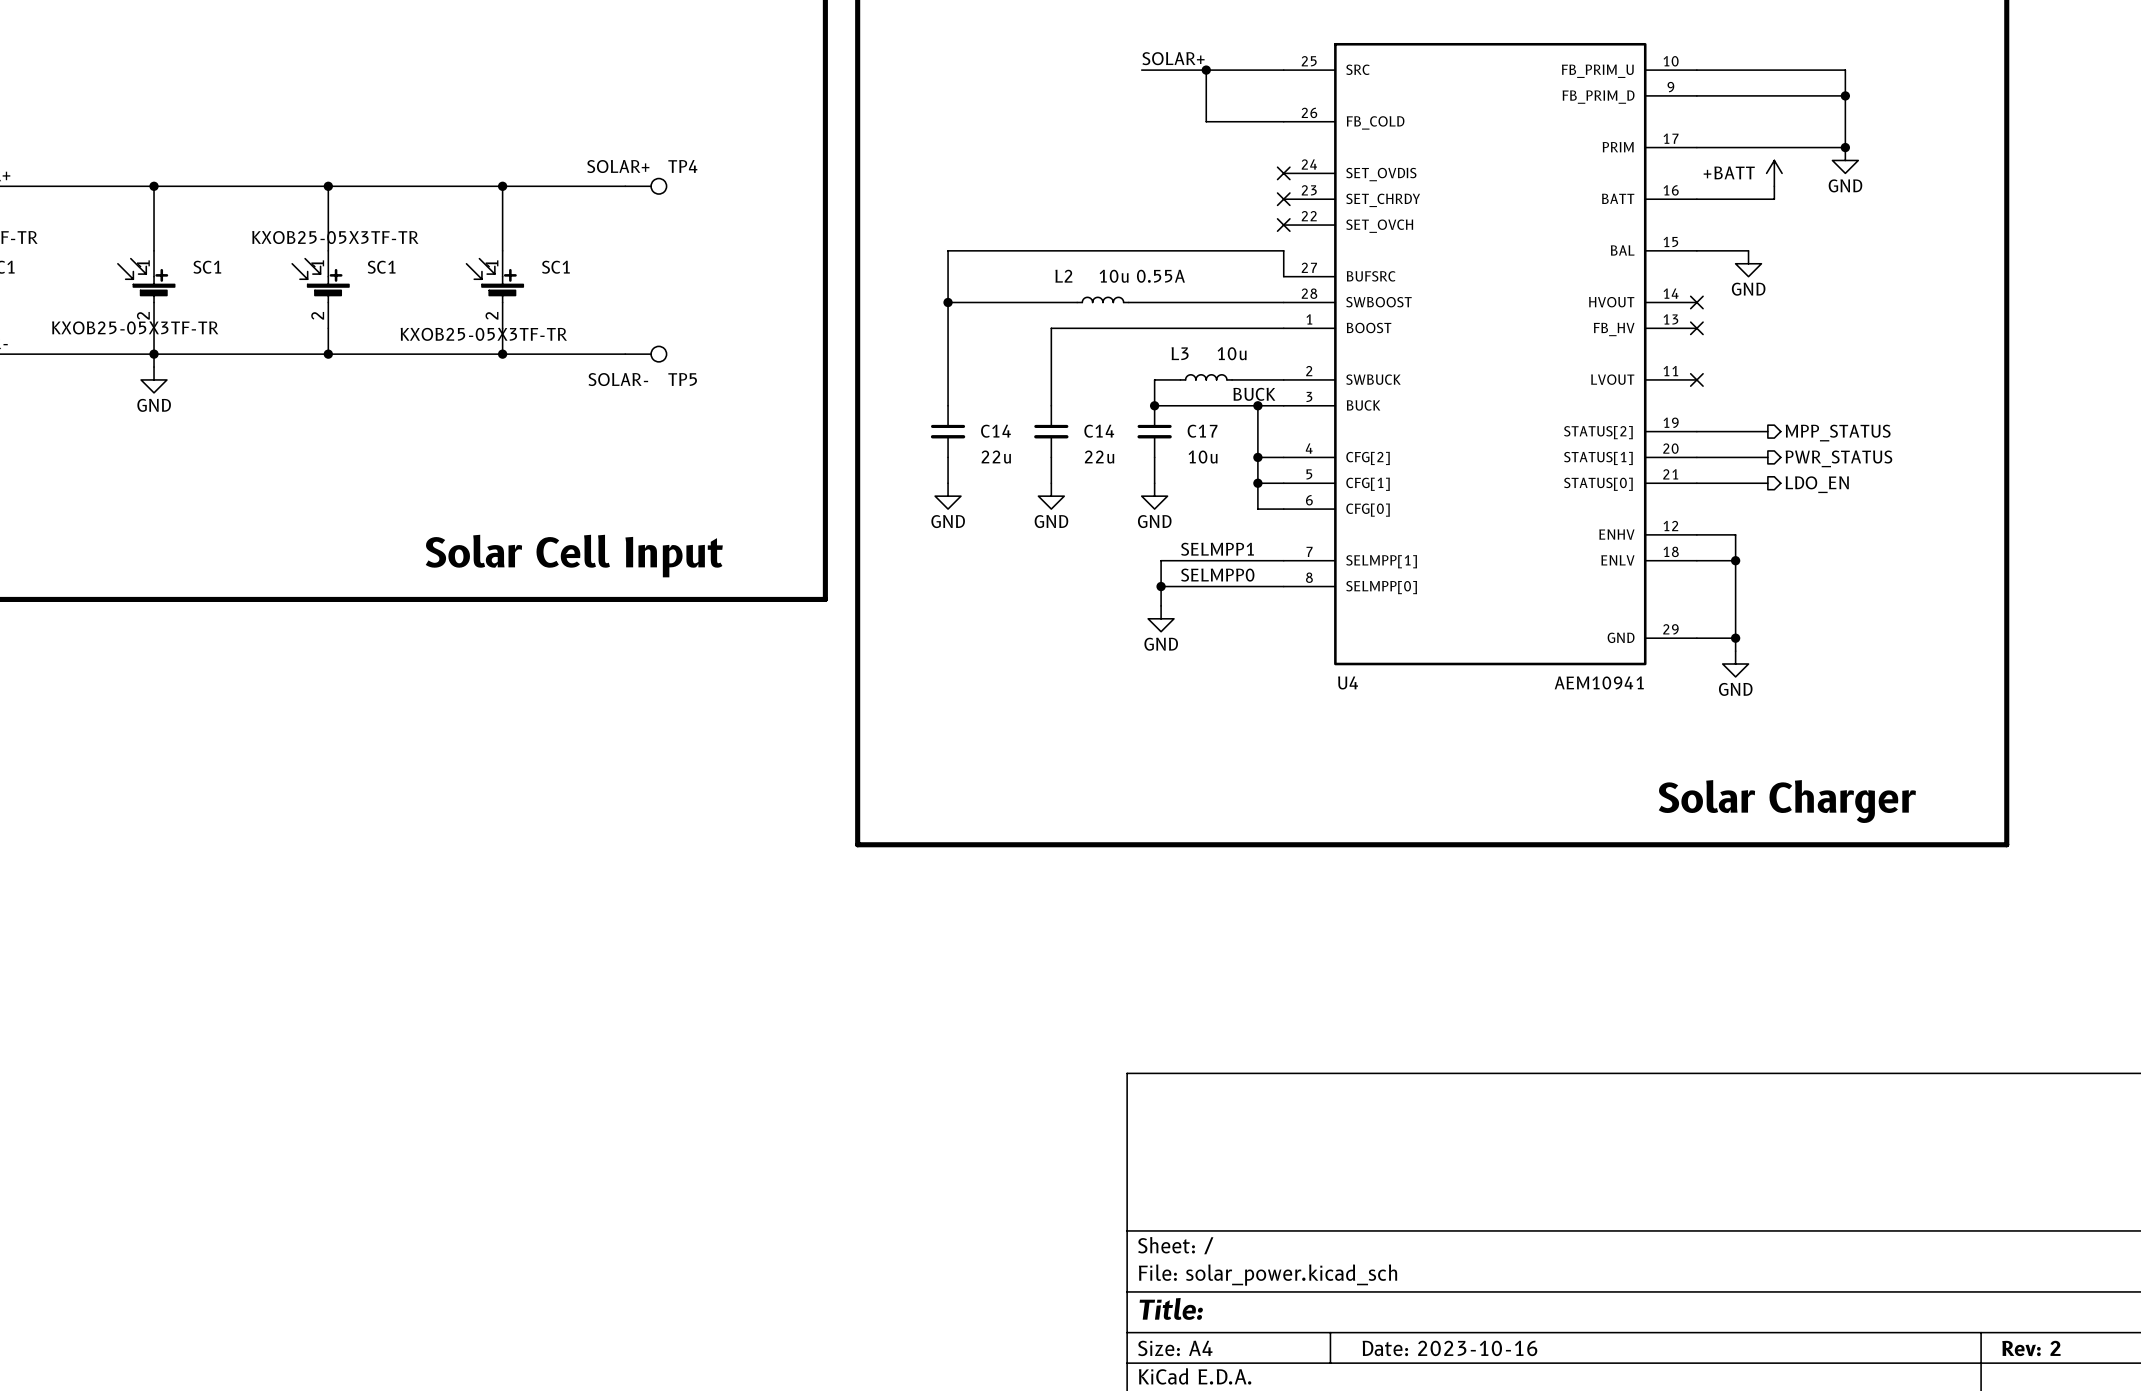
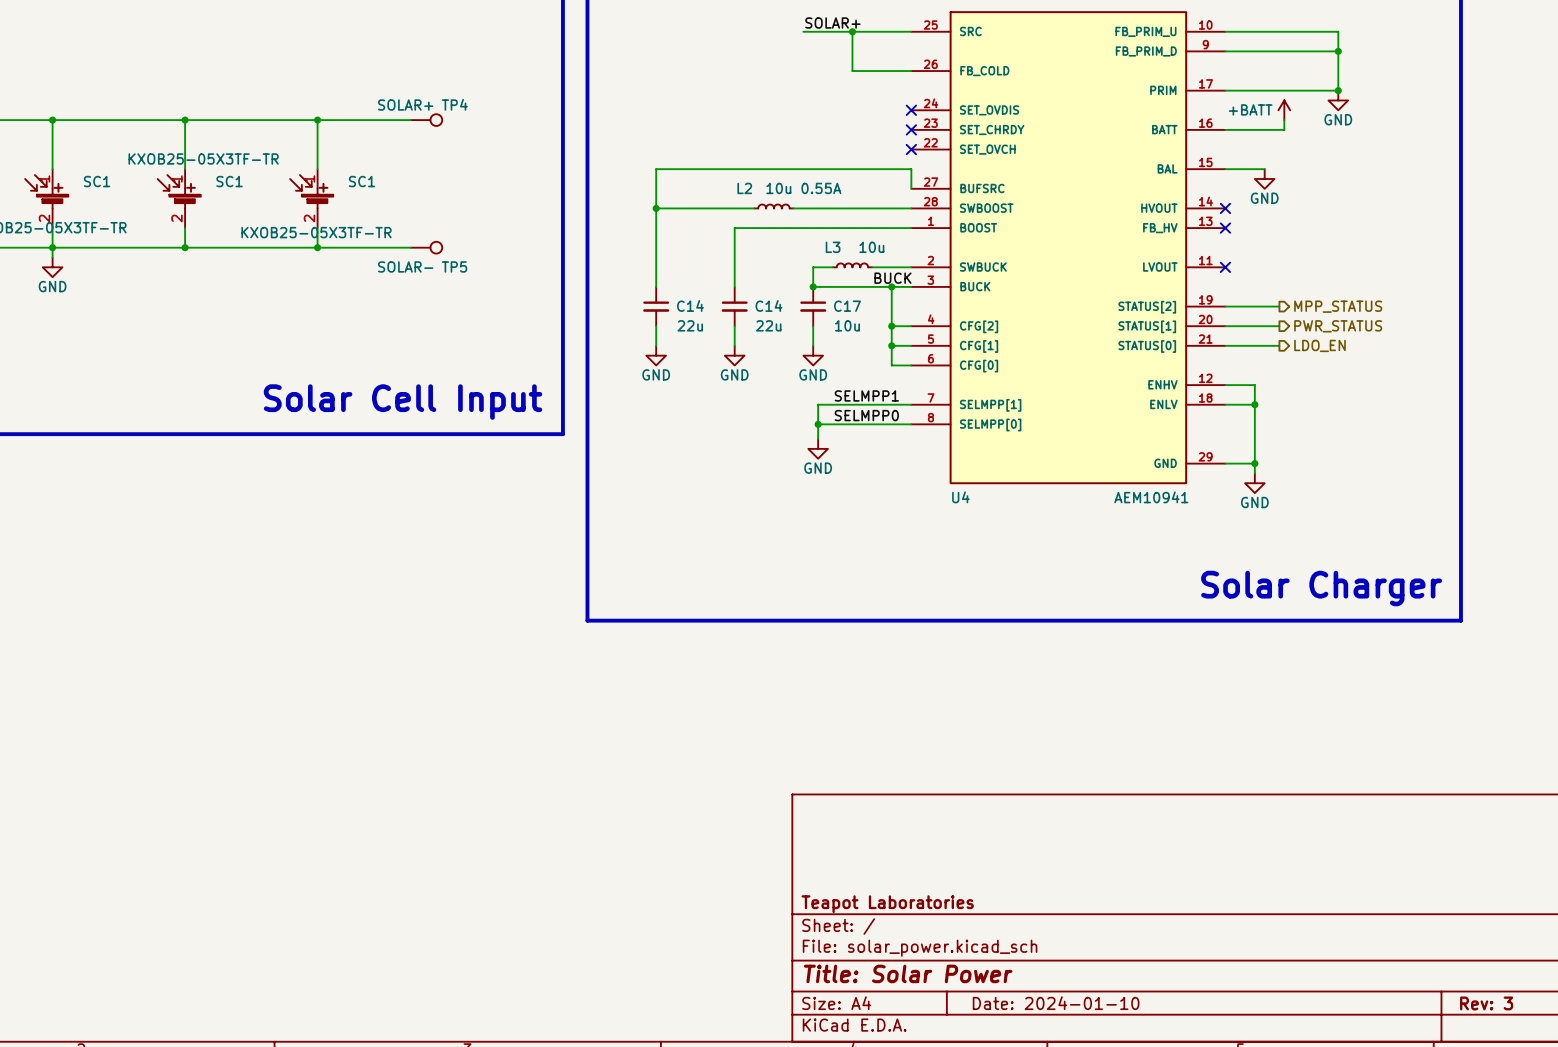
title block: none -> Teapot Laboratories (887, 904)
title block: Title: (1171, 1308) -> Title: Solar Power (908, 973)
title block: Date: 2023-10-16 (1449, 1348) -> Date: 2024-01-10 (1056, 1003)
title block: Rev: 2 (2031, 1348) -> Rev: 3 (1486, 1003)

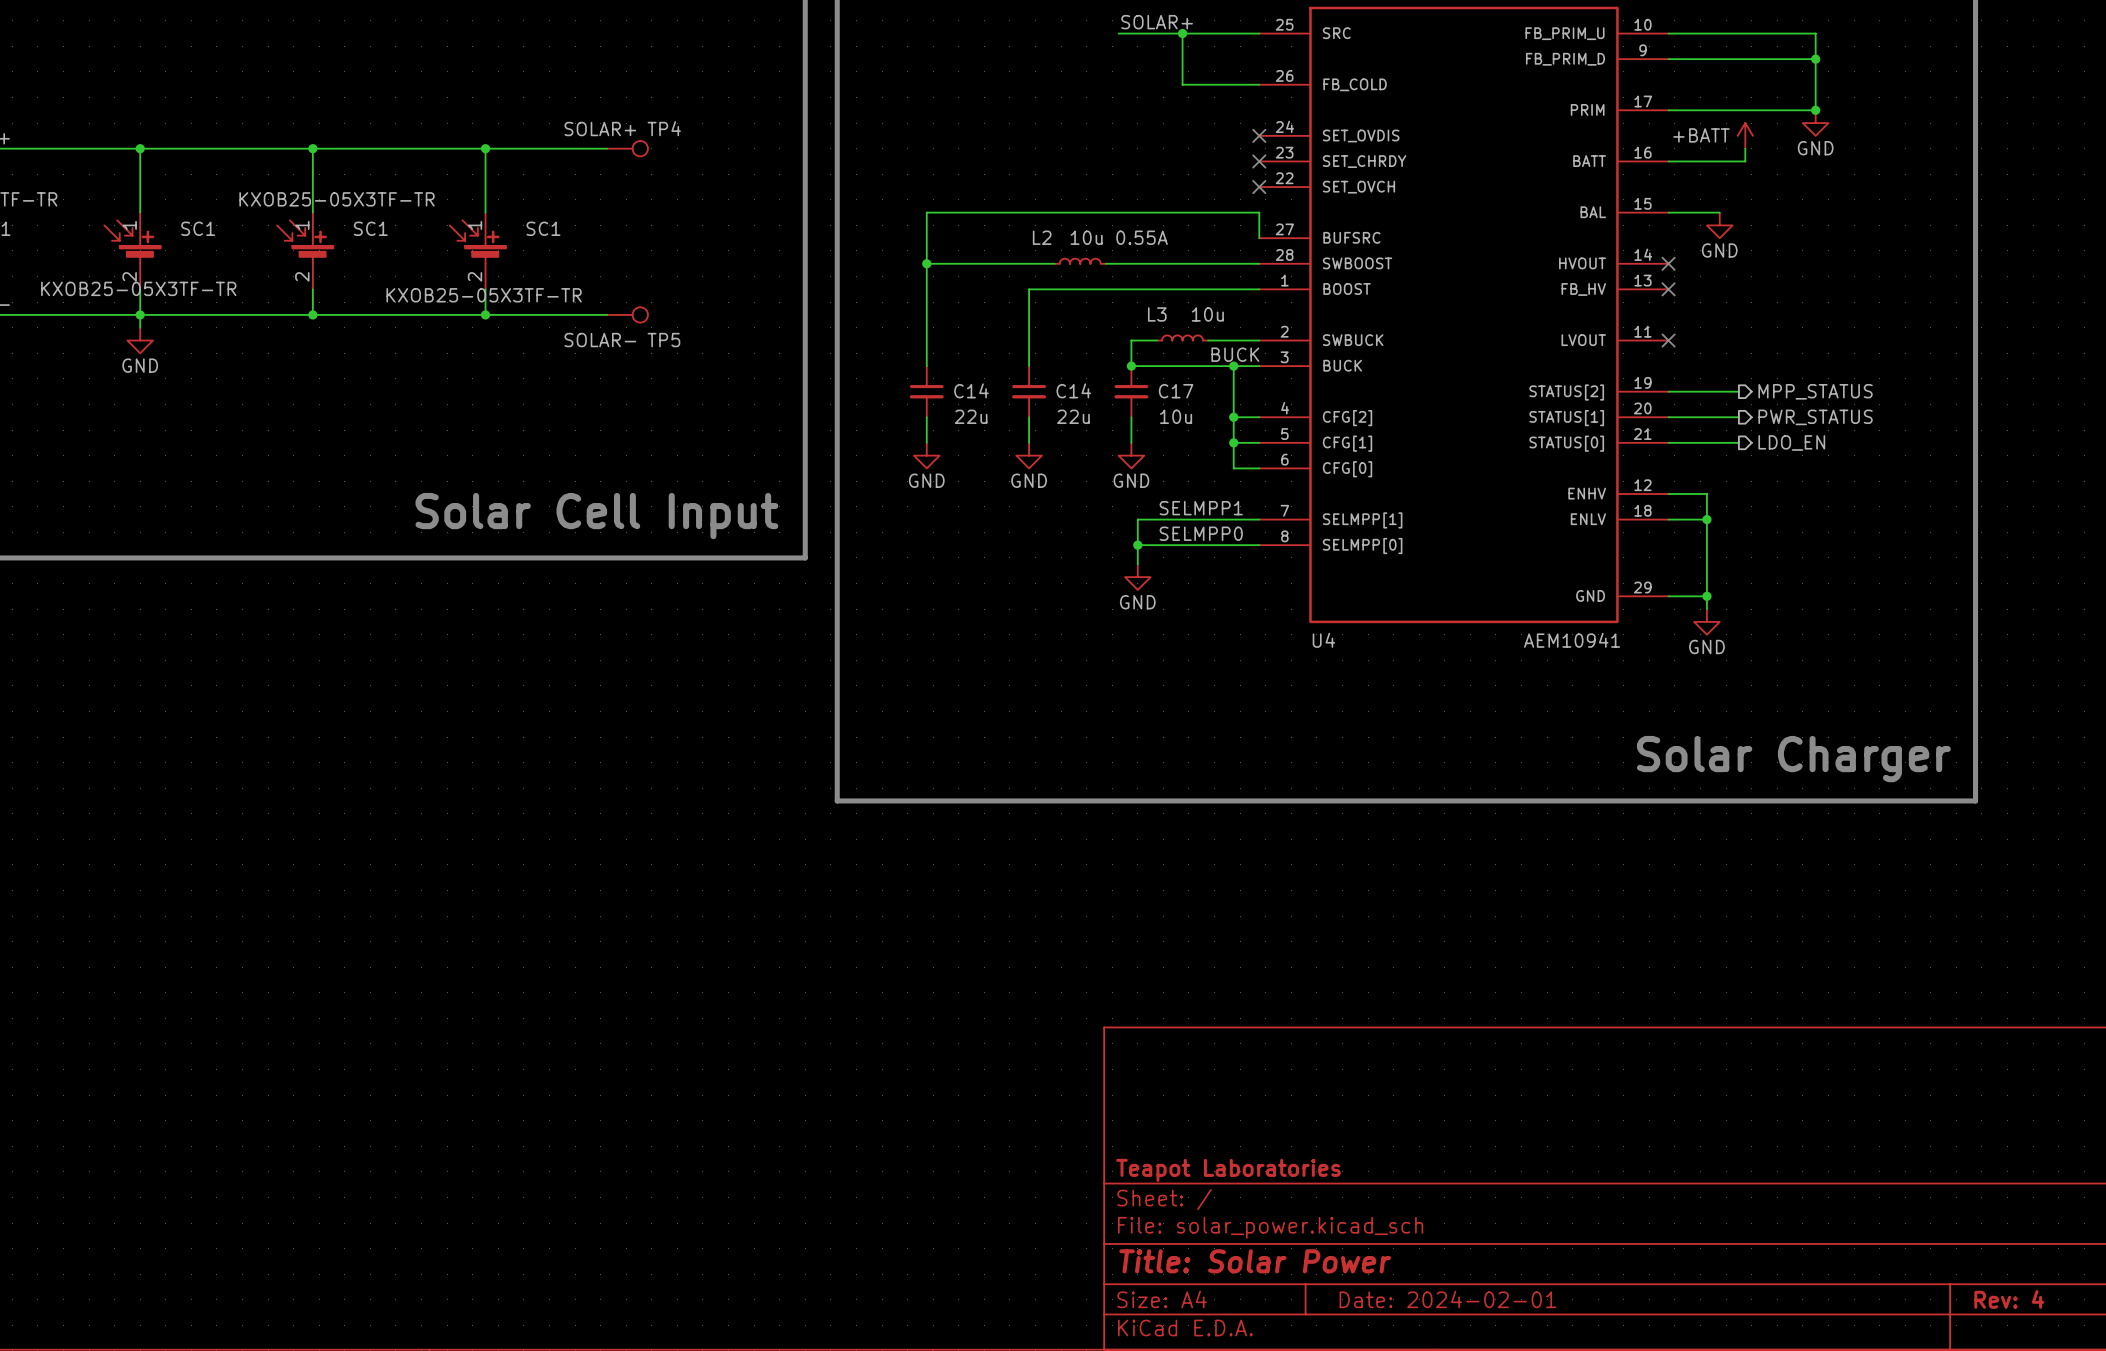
title block: Date: 2024-01-10 (1056, 1003) -> Date: 2024-02-01 (1447, 1299)
title block: Rev: 3 (1486, 1003) -> Rev: 4 (2009, 1299)

